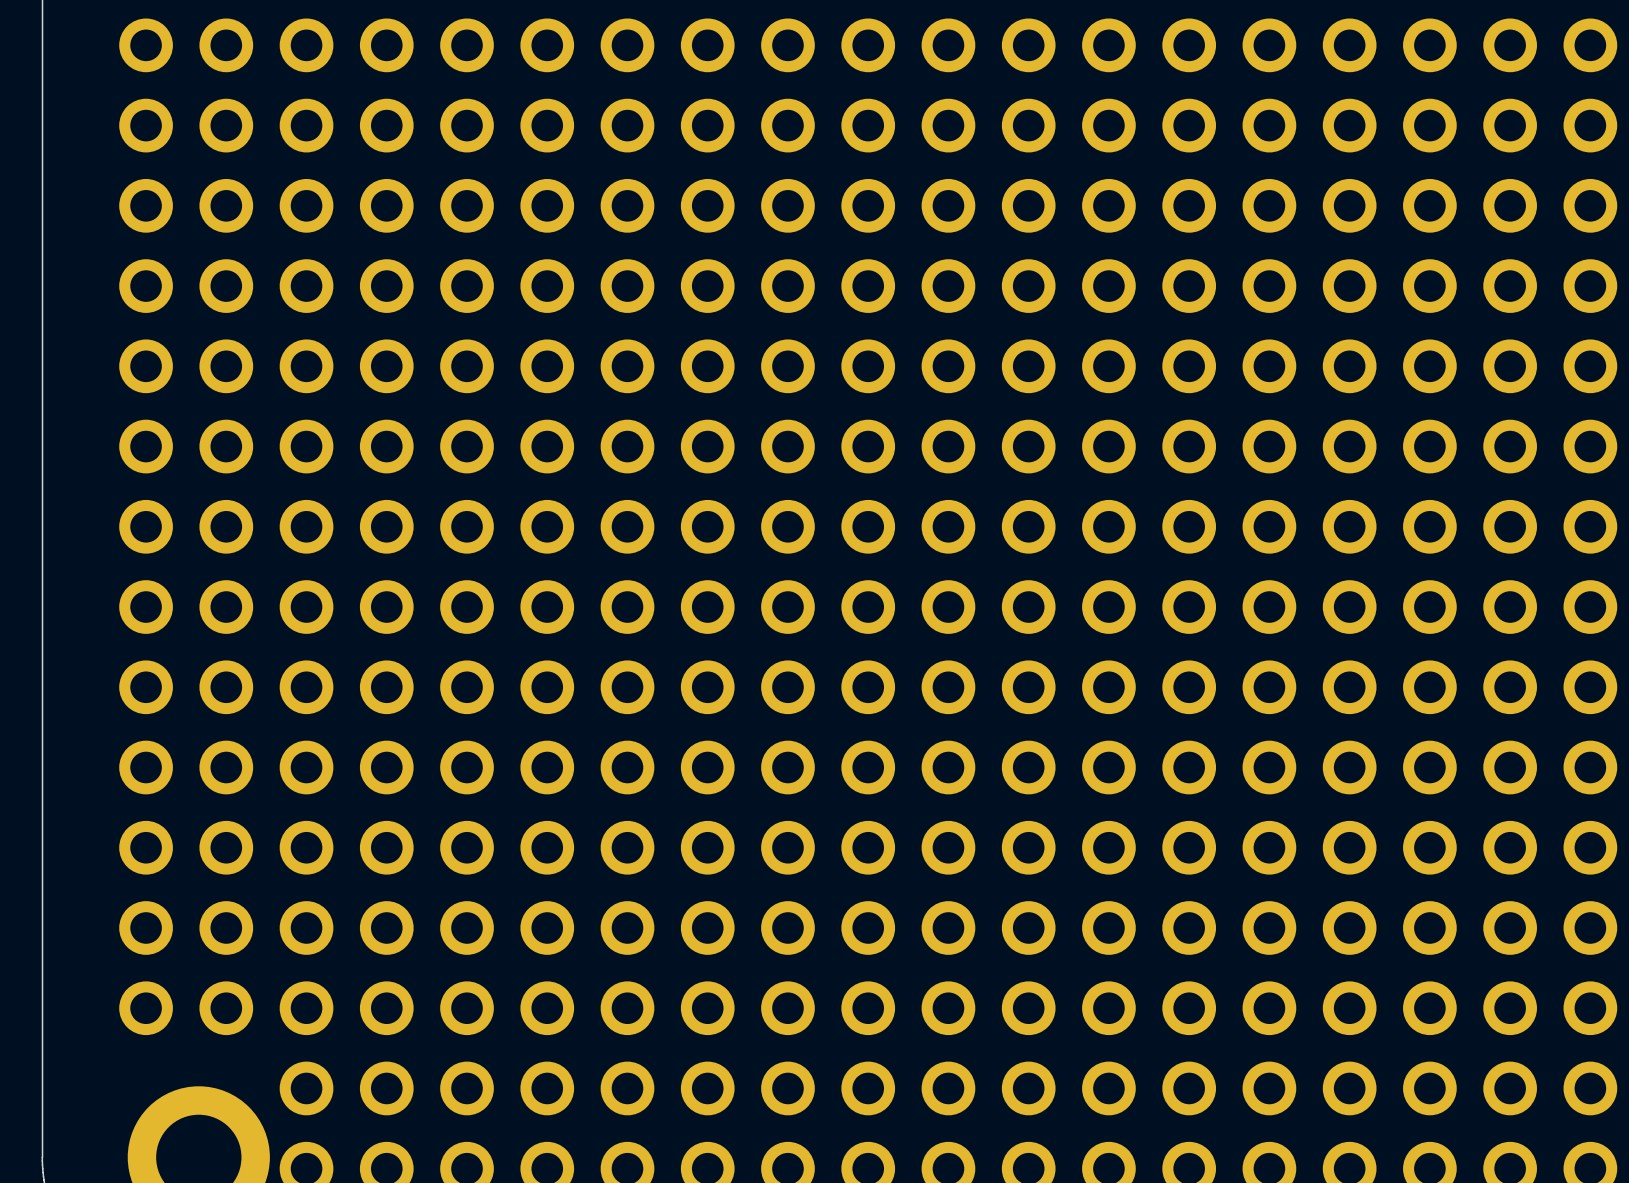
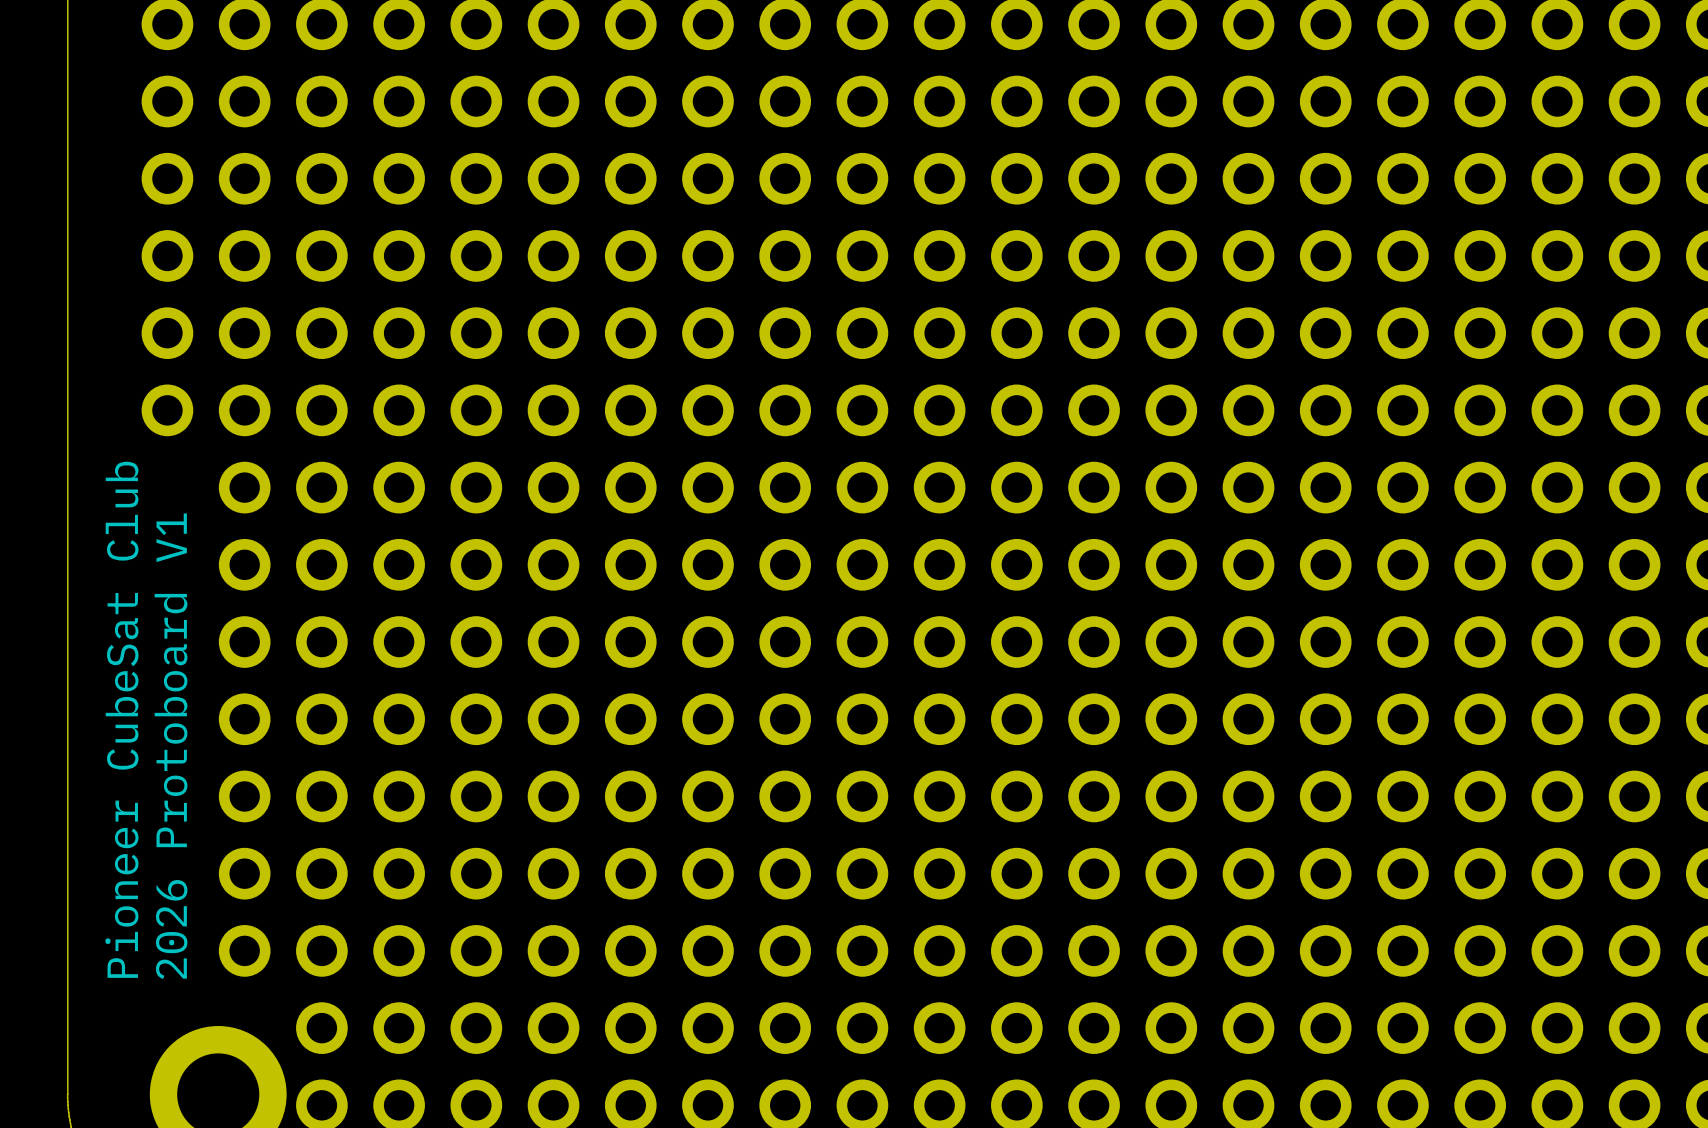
part: (146, 526) -> none
part: (146, 607) -> none
part: (146, 687) -> none
part: (146, 767) -> none
text: none -> Pioneer CubeSat Club (121, 719)
text: none -> 2026 Protoboard V1 (171, 746)
part: (146, 847) -> none
part: (146, 927) -> none
part: (146, 1008) -> none

